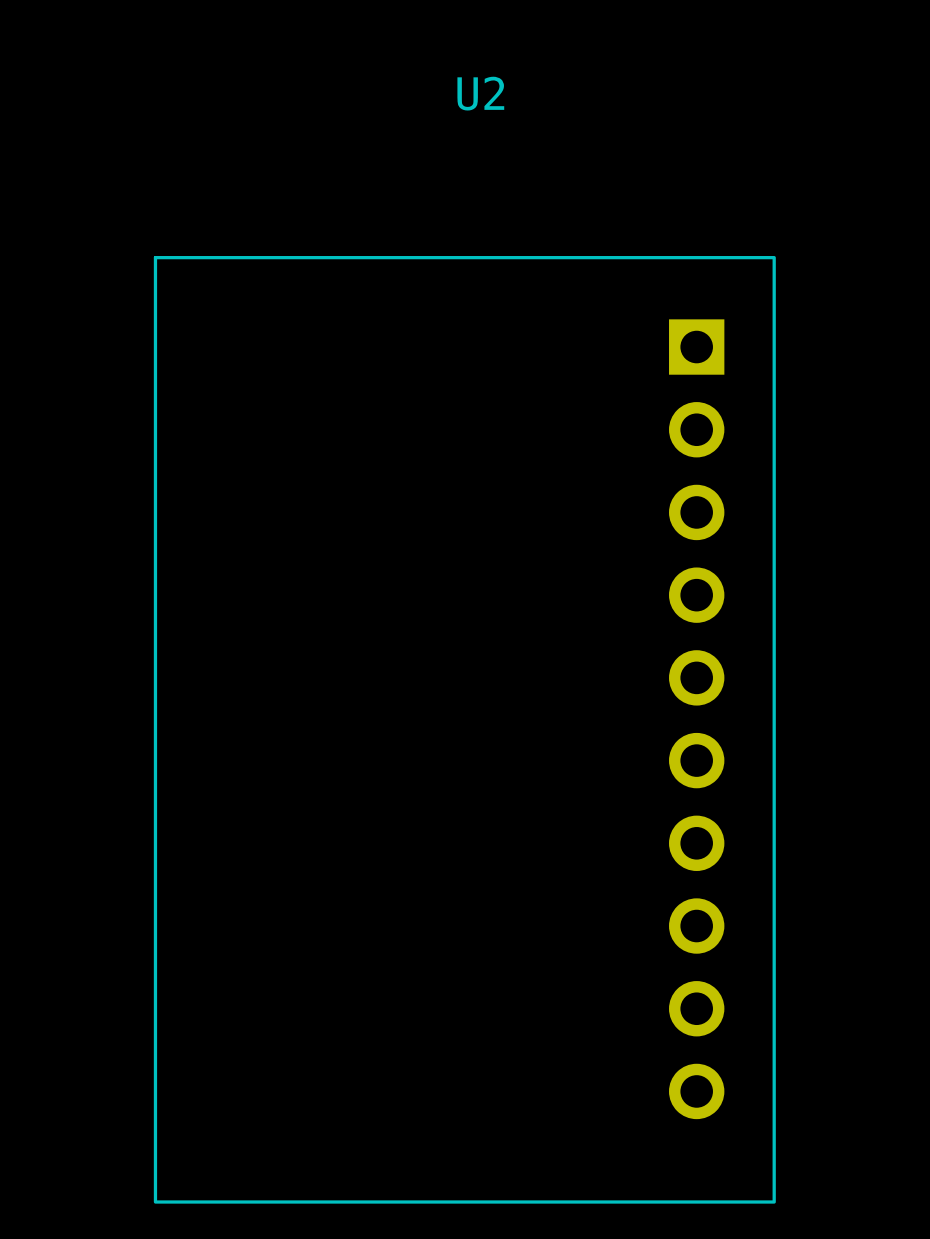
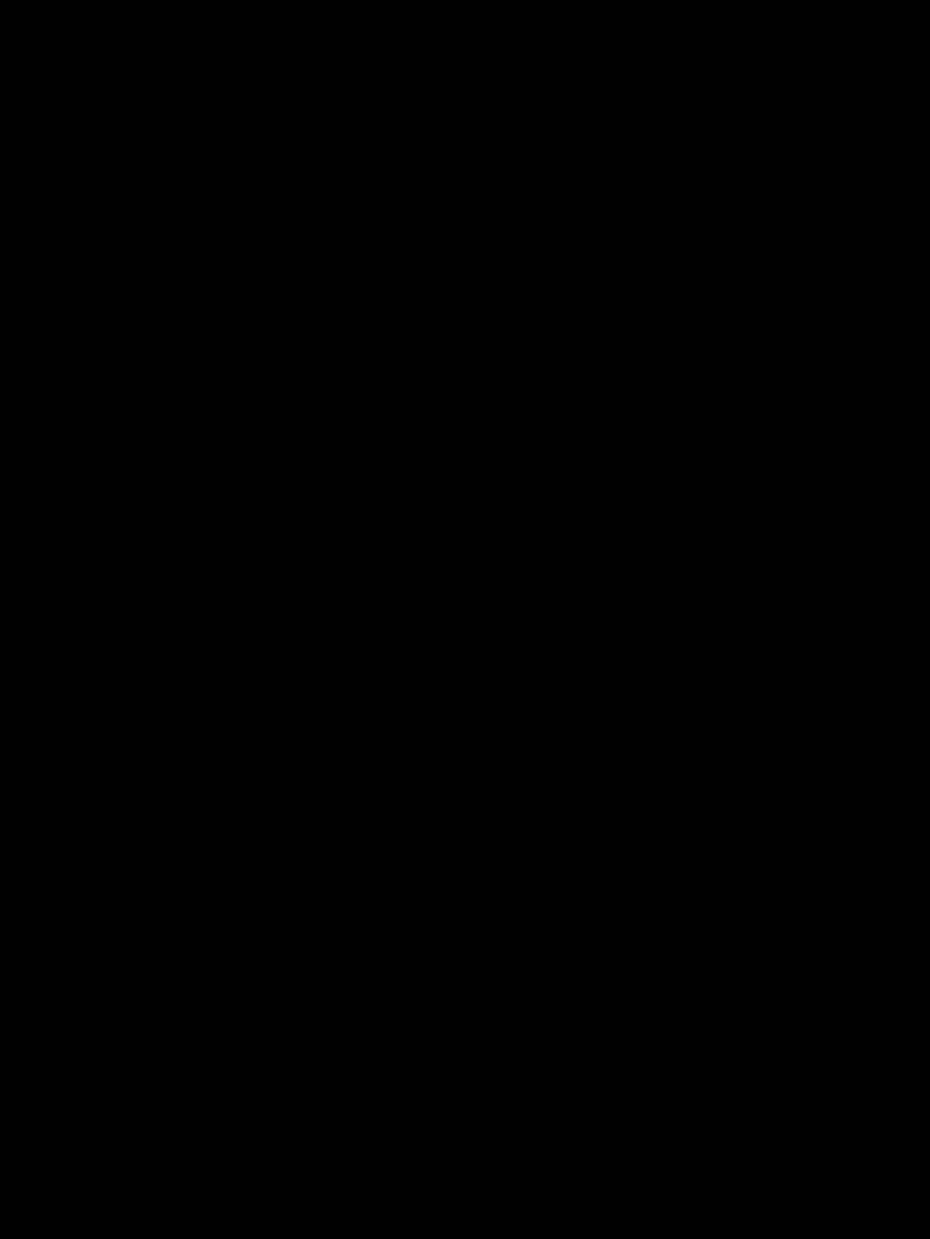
U2: (464, 729) -> none

